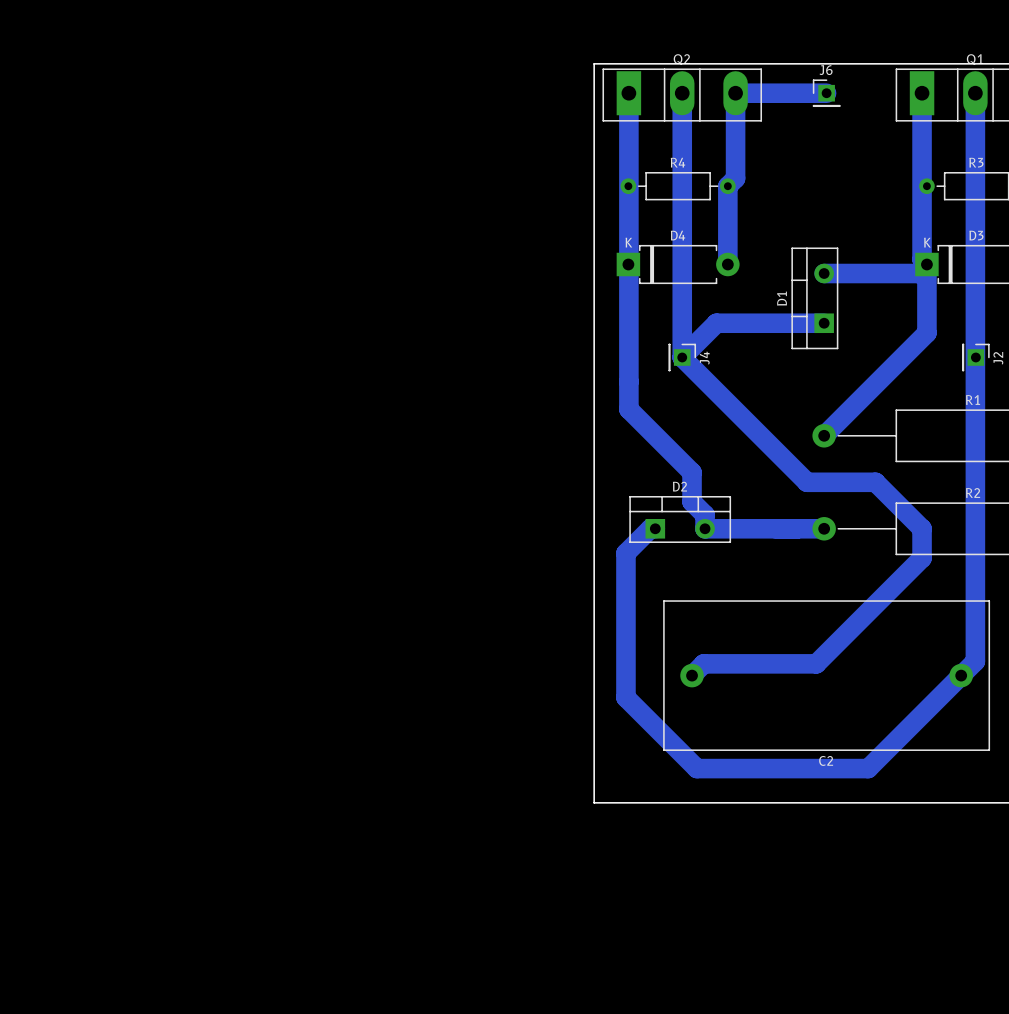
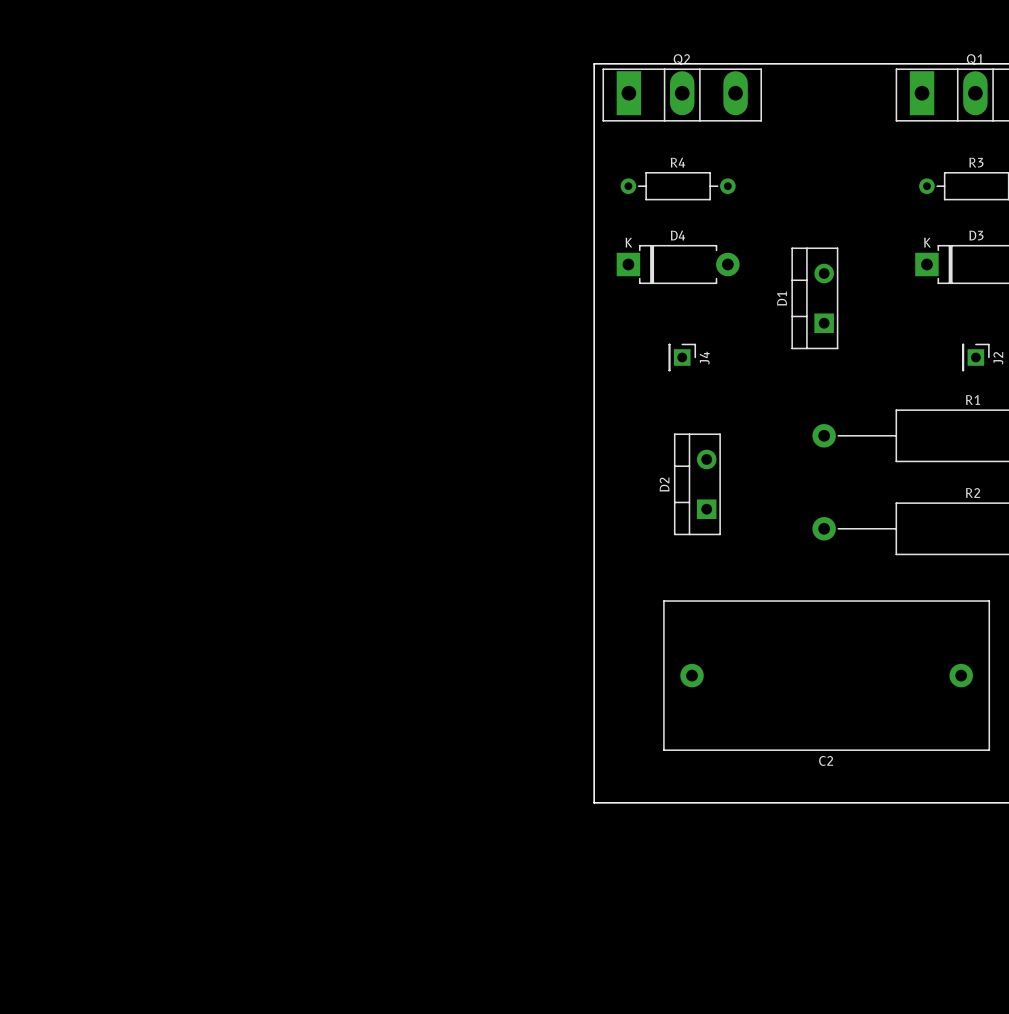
bottom track: (628, 93) (628, 409) (692, 472) (692, 501) (705, 514) (705, 528) (824, 528) -> none
bottom track: (682, 93) (682, 357) -> none
bottom track: (826, 93) (735, 93) (735, 178) (727, 186) (727, 264) -> none
J6: (826, 93) -> none
bottom track: (922, 93) (922, 259) (926, 264) -> none
bottom track: (975, 93) (975, 661) (868, 768) (696, 768) (625, 697) (625, 553) (650, 528) (655, 528) -> none
bottom track: (926, 264) (917, 273) (824, 273) -> none
bottom track: (926, 264) (926, 333) (824, 435) -> none
bottom track: (824, 323) (716, 323) (682, 357) -> none
bottom track: (682, 357) (807, 482) (875, 482) (922, 528) (922, 558) (816, 663) (703, 663) (692, 675) -> none
D2 rotation: 0° (680, 519) -> 90° counterclockwise (697, 484)

